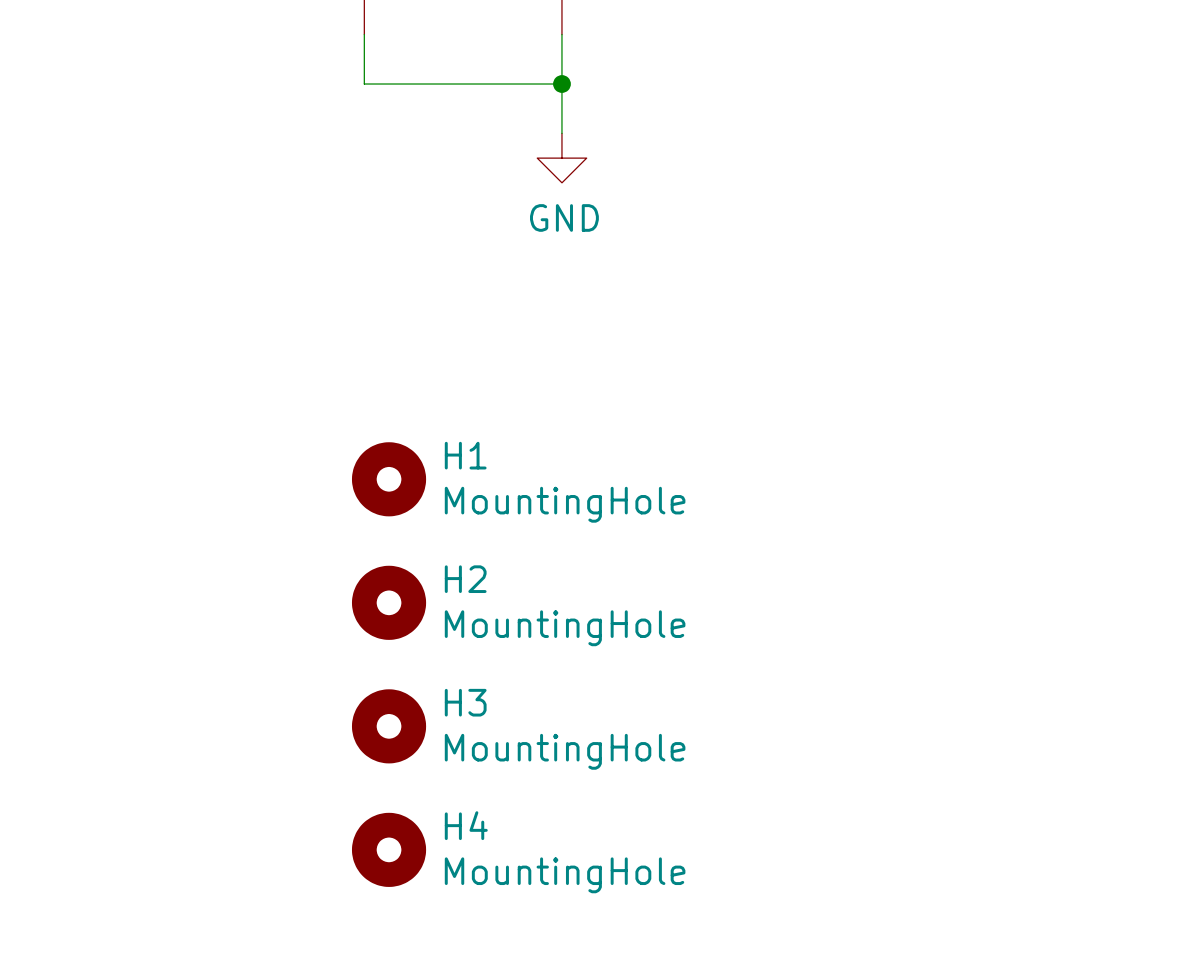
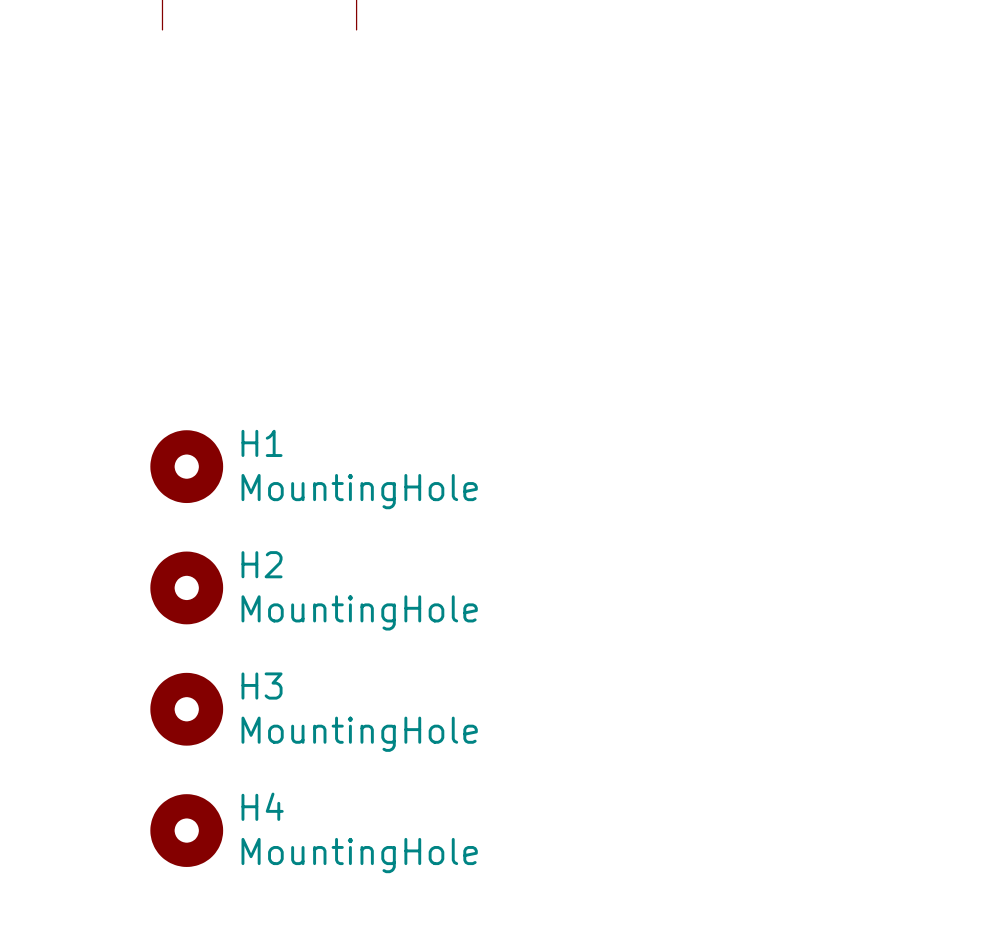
wire: (364, 34) (364, 84) (561, 84) -> none
wire: (561, 34) (561, 133) -> none
junction: (561, 84) -> none
power symbol: GND (561, 158) -> none

